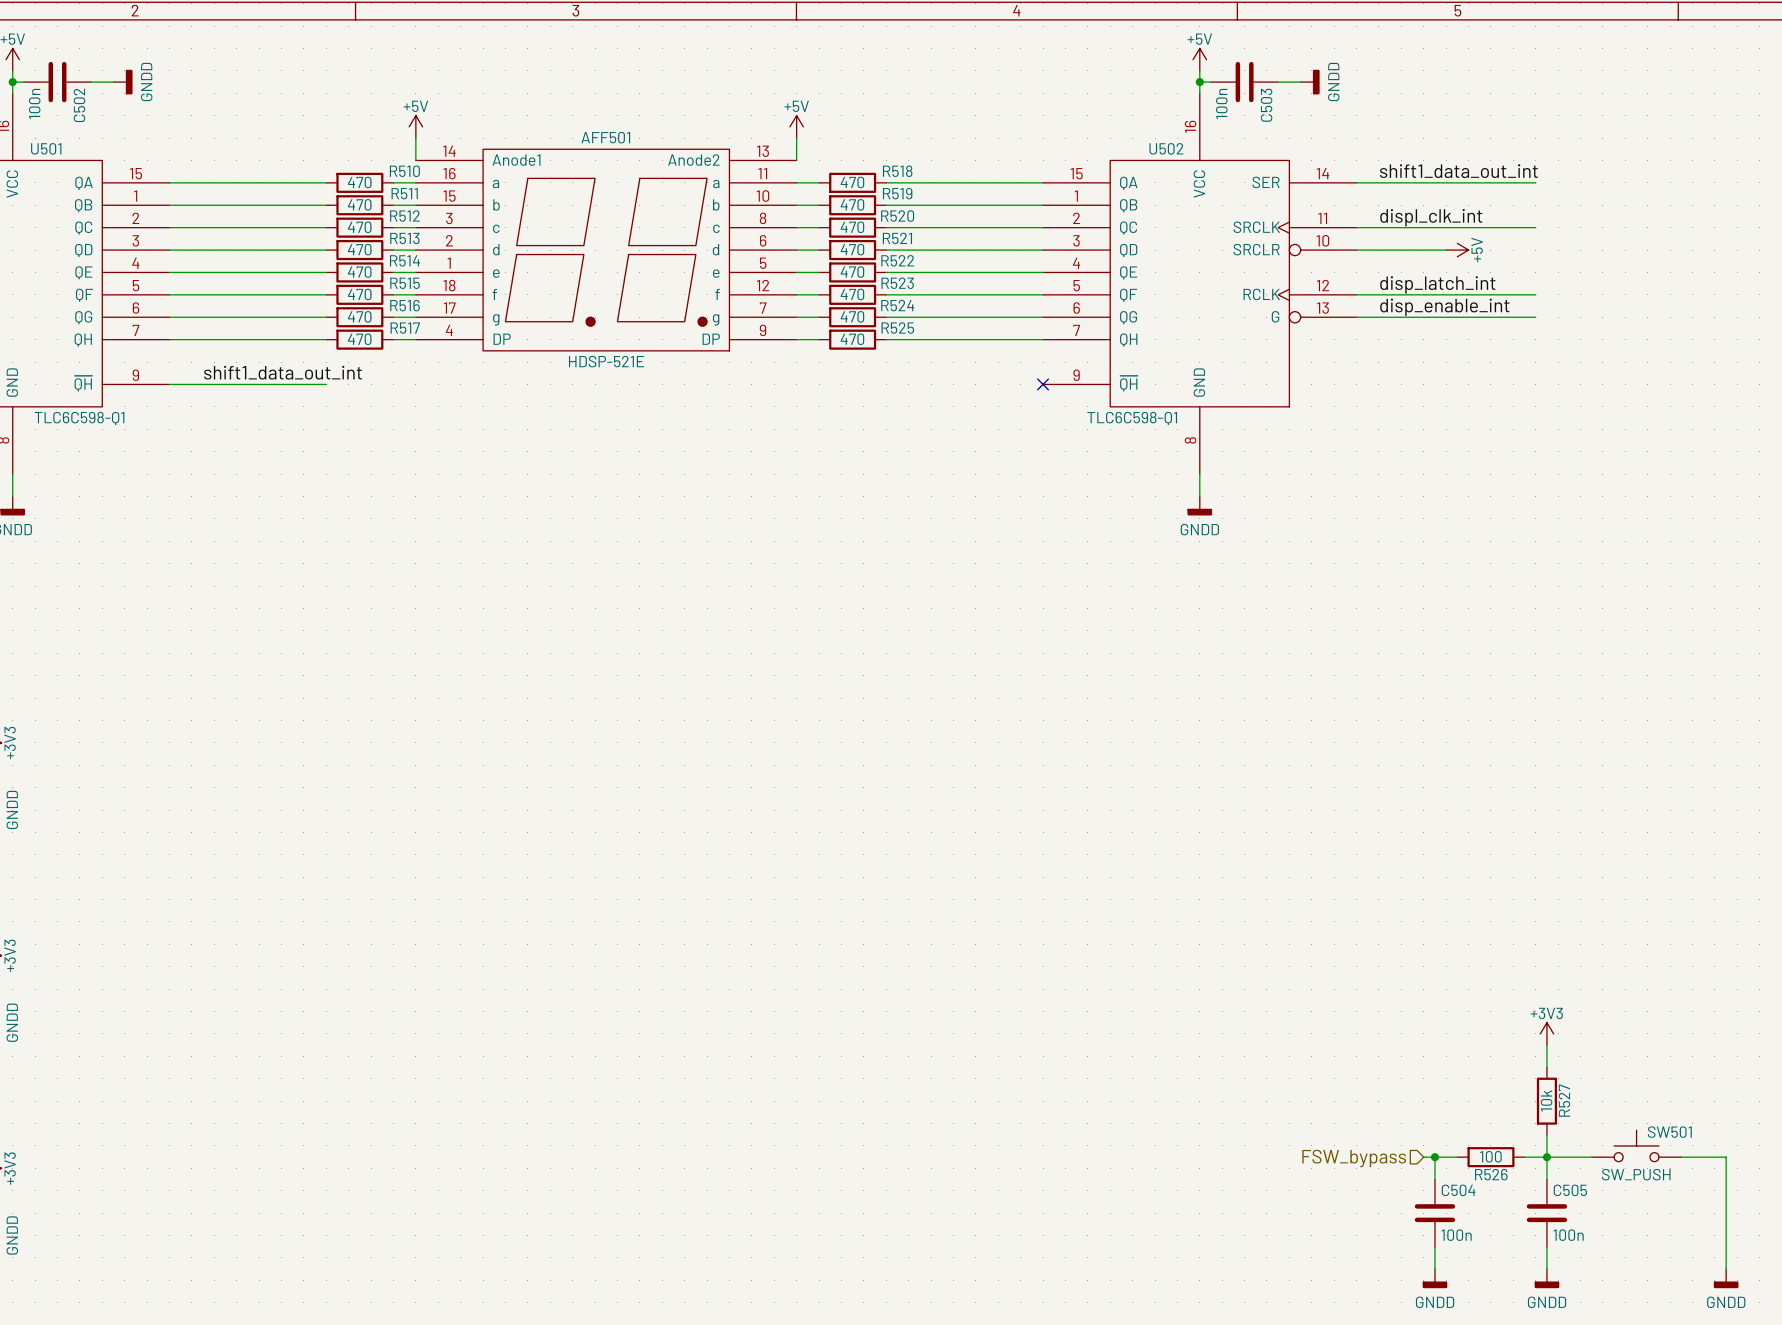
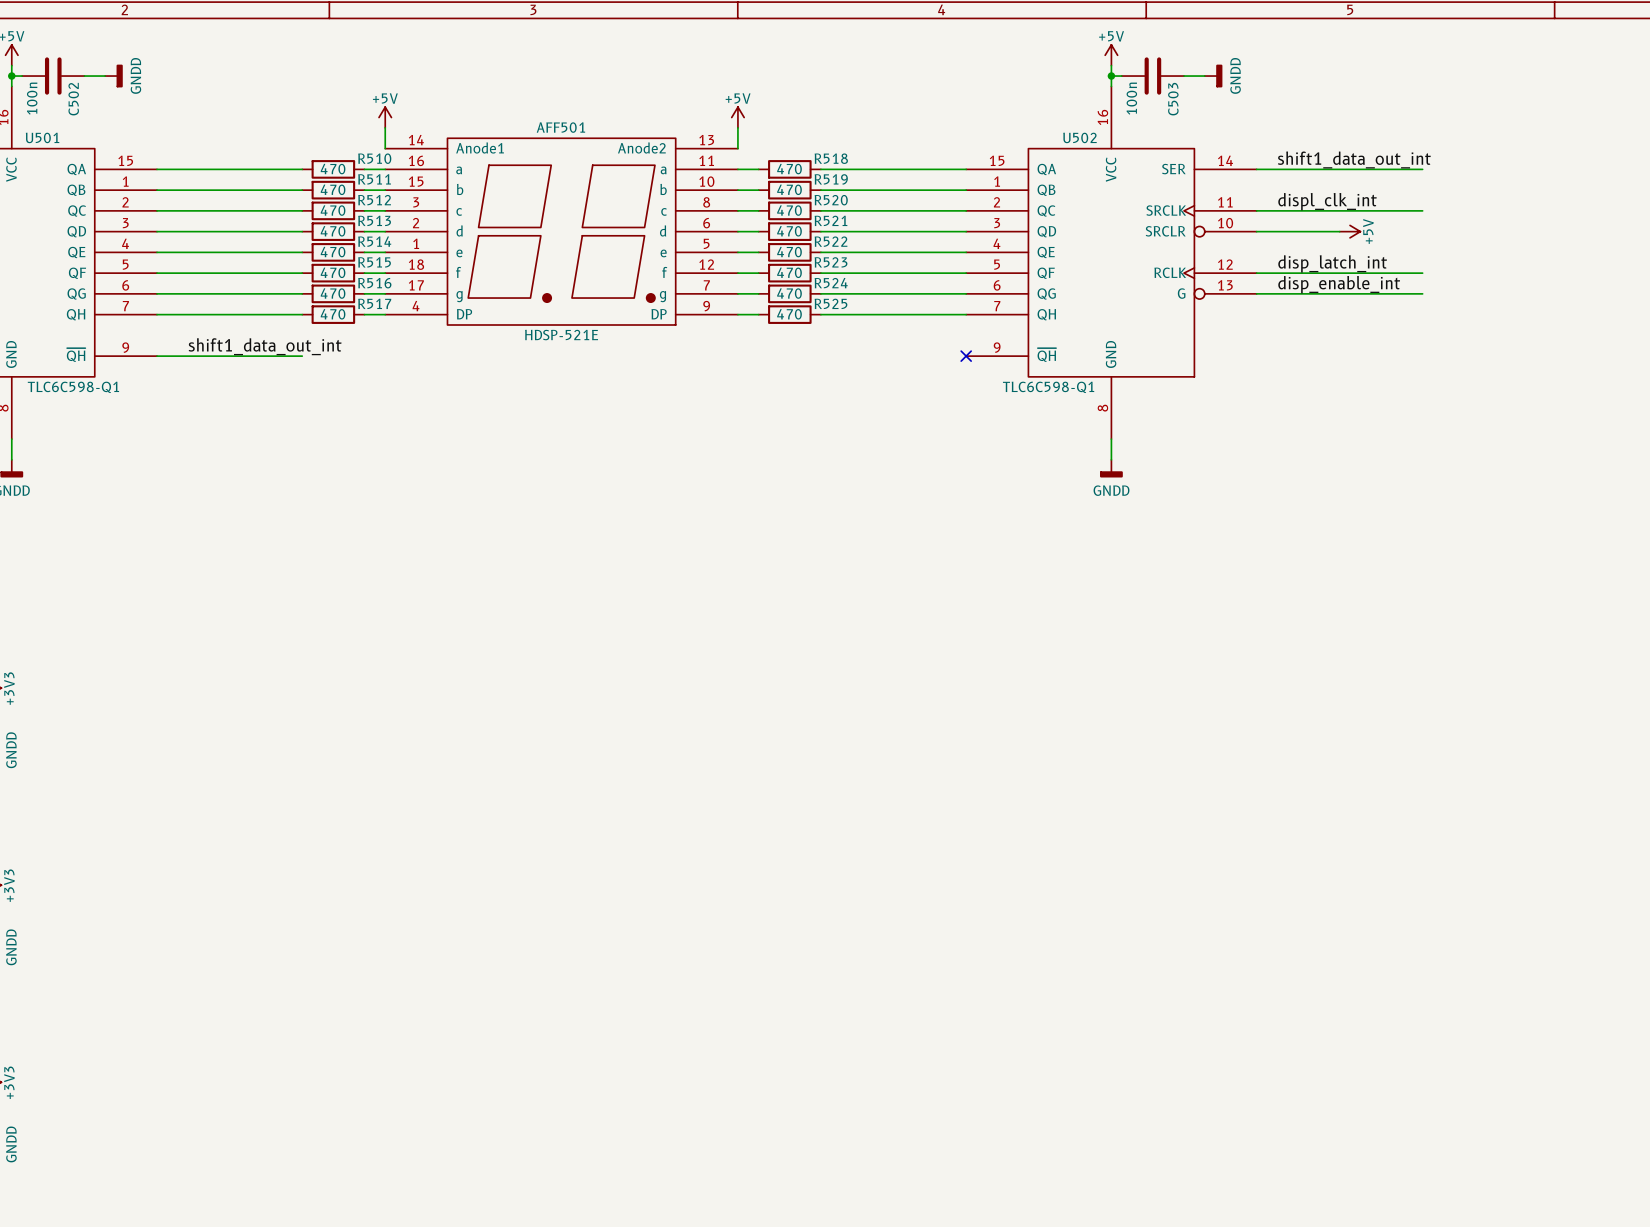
power symbol: +3V3 (1546, 1033) -> none
wire: (1546, 1045) (1546, 1067) -> none
R527: 10k (1546, 1101) -> none
wire: (1546, 1134) (1546, 1179) -> none
SW501: SW_PUSH (1636, 1145) -> none
wire: (1423, 1157) (1457, 1157) -> none
wire: (1434, 1157) (1434, 1179) -> none
junction: (1434, 1157) -> none
R526: 100 (1490, 1157) -> none
wire: (1524, 1157) (1591, 1157) -> none
junction: (1546, 1157) -> none
wire: (1681, 1157) (1726, 1157) (1726, 1269) -> none
hierarchical label: FSW_bypass (1354, 1158) -> none
C504: 100n (1434, 1213) -> none
C505: 100n (1546, 1213) -> none
wire: (1434, 1246) (1434, 1269) -> none
wire: (1546, 1246) (1546, 1269) -> none
power symbol: GNDD (1434, 1278) -> none
power symbol: GNDD (1546, 1278) -> none
power symbol: GNDD (1726, 1278) -> none

